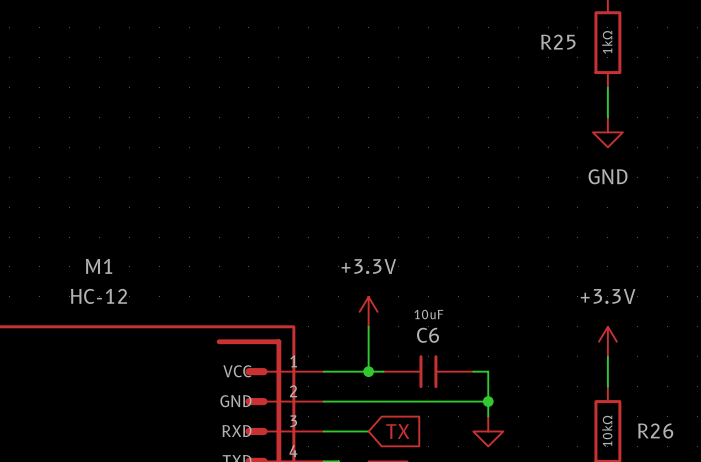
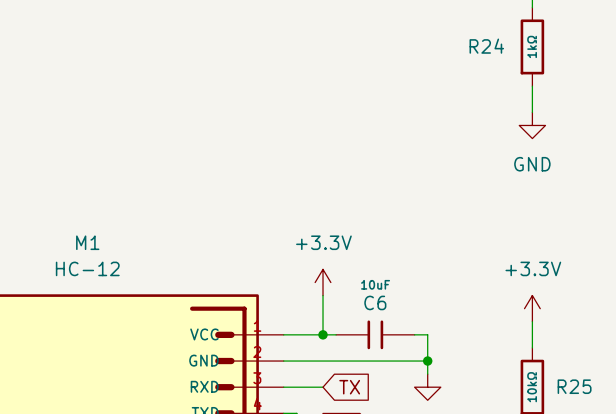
R25 name: R25 (558, 42) -> R24 (486, 46)
R26 name: R26 (655, 431) -> R25 (574, 386)

